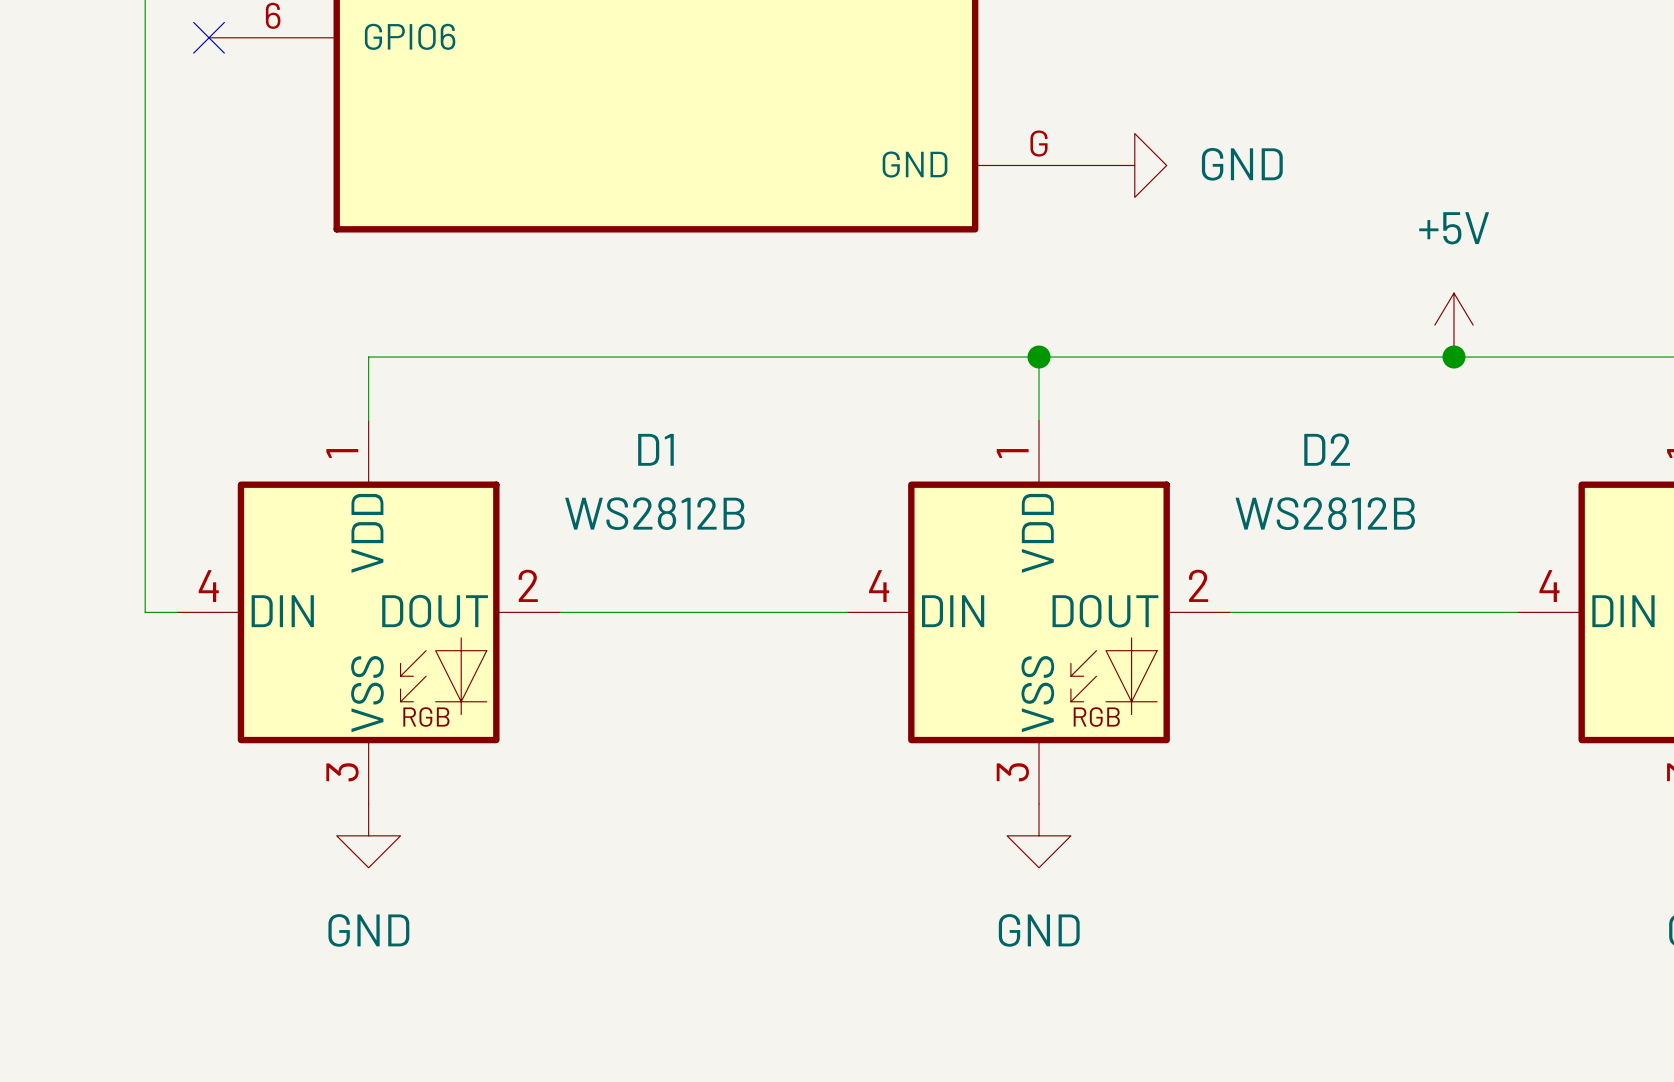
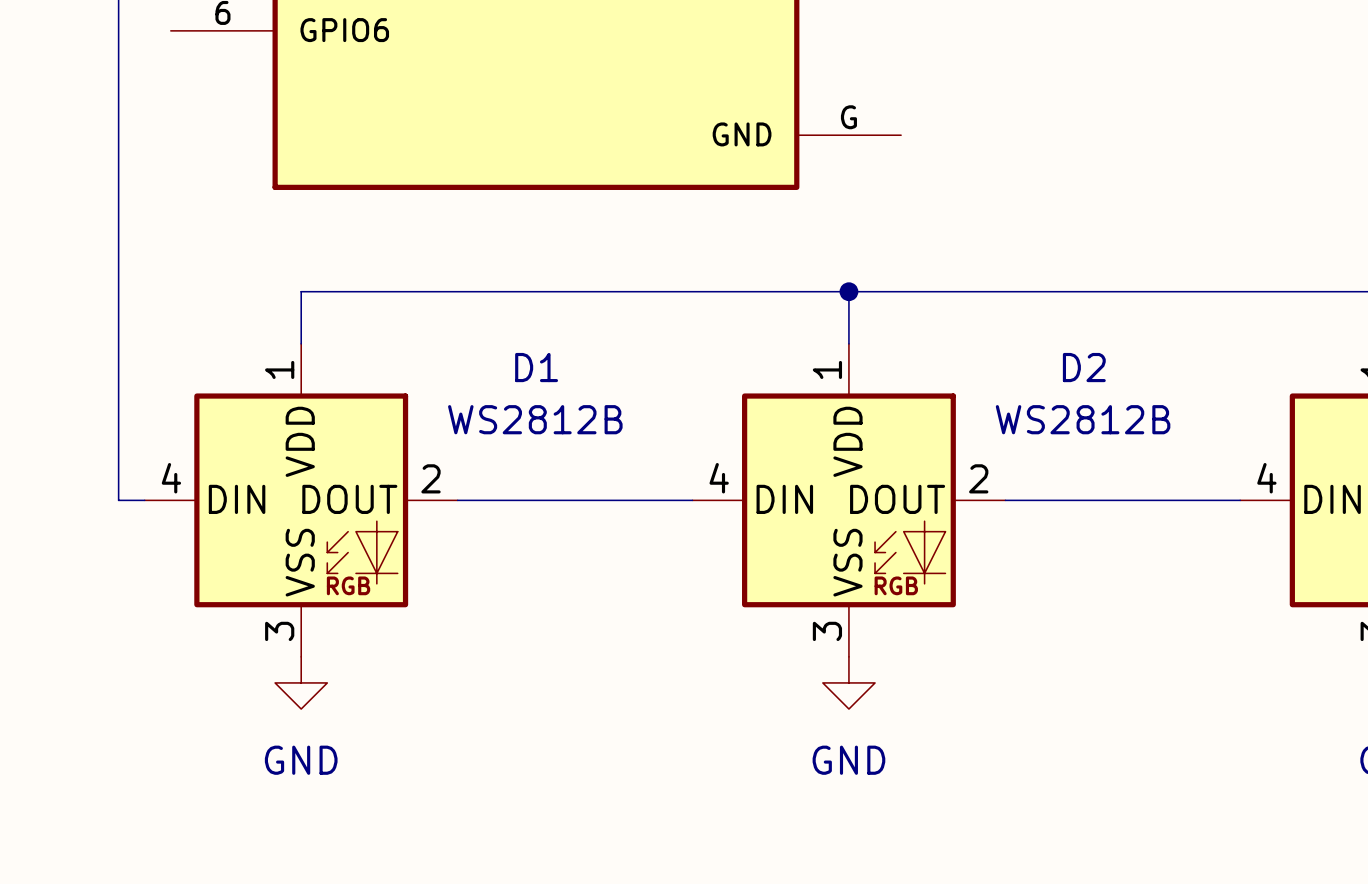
no-connect mark: (209, 37) -> none
power symbol: GND (1134, 165) -> none
power symbol: +5V (1453, 325) -> none
junction: (1453, 357) -> none

